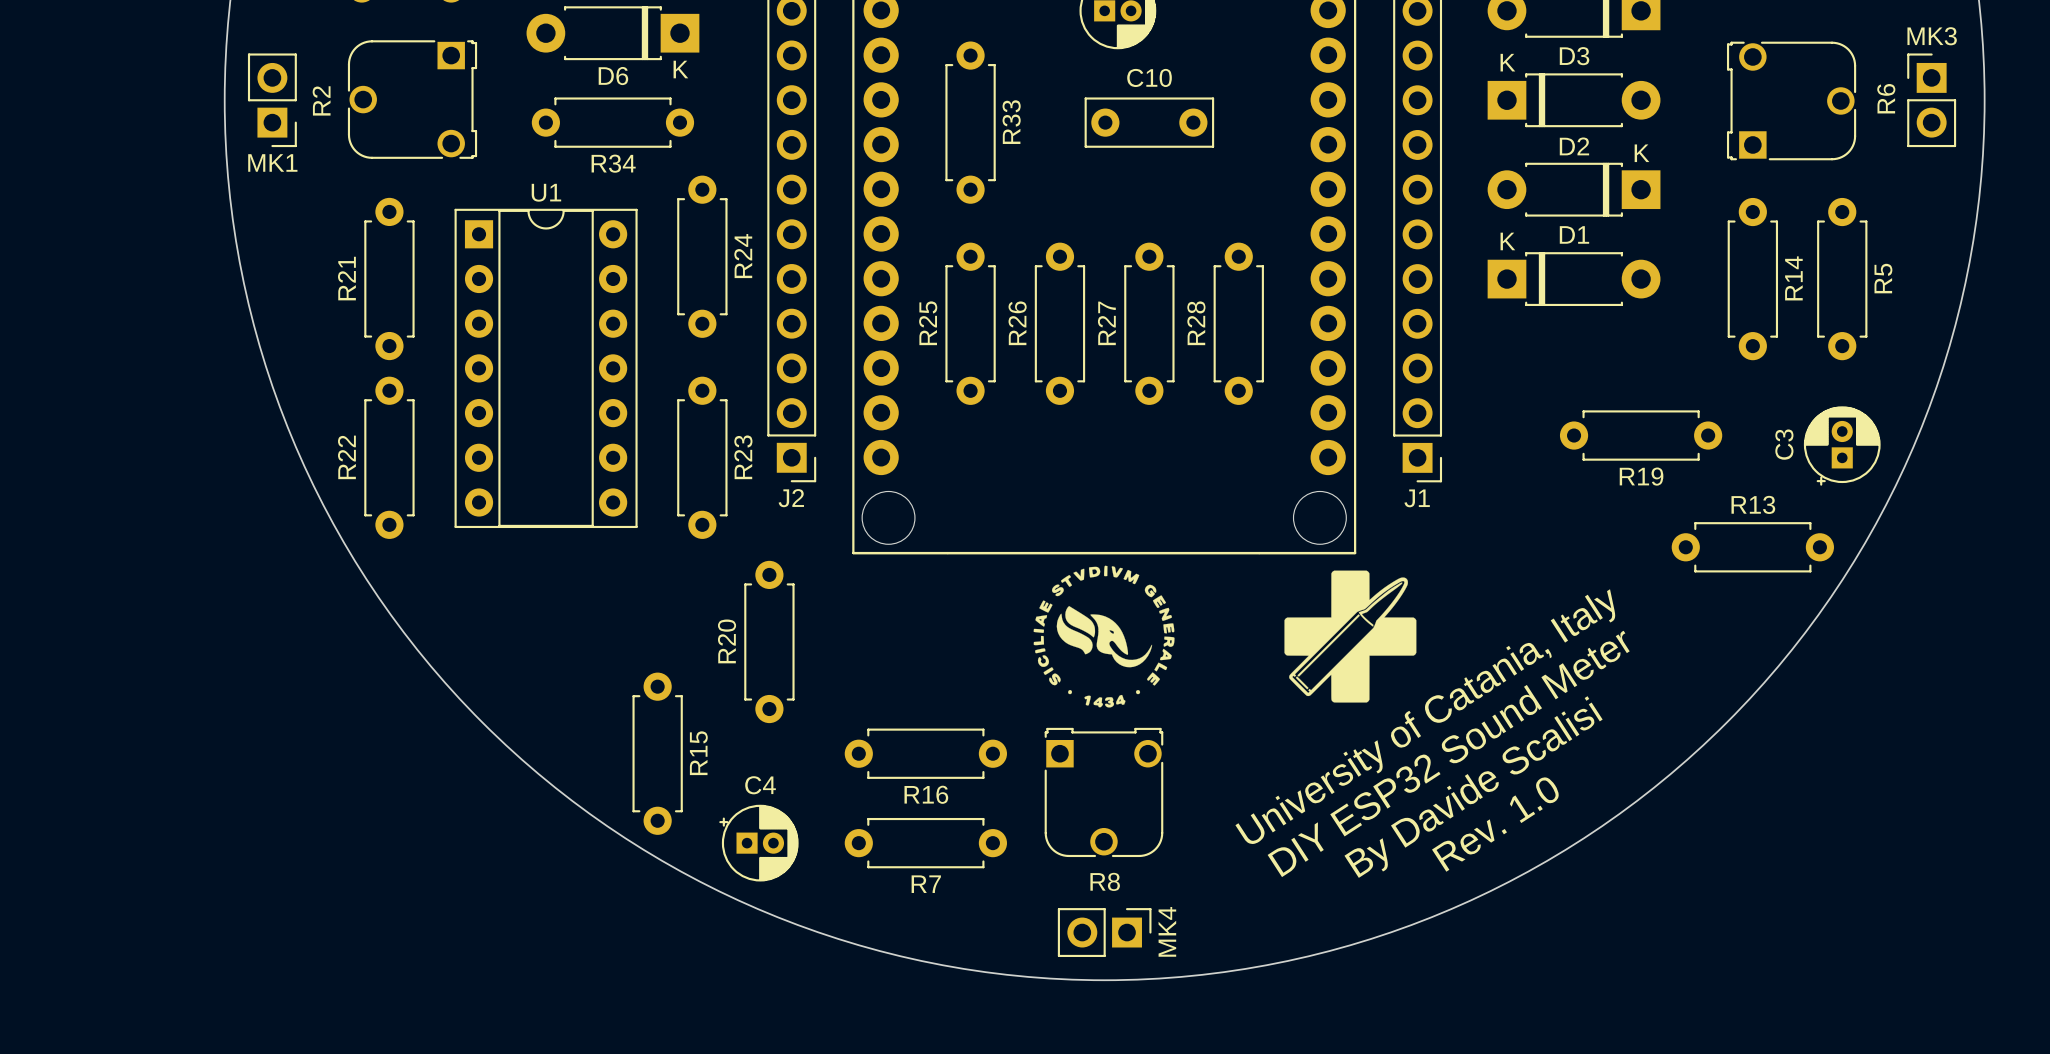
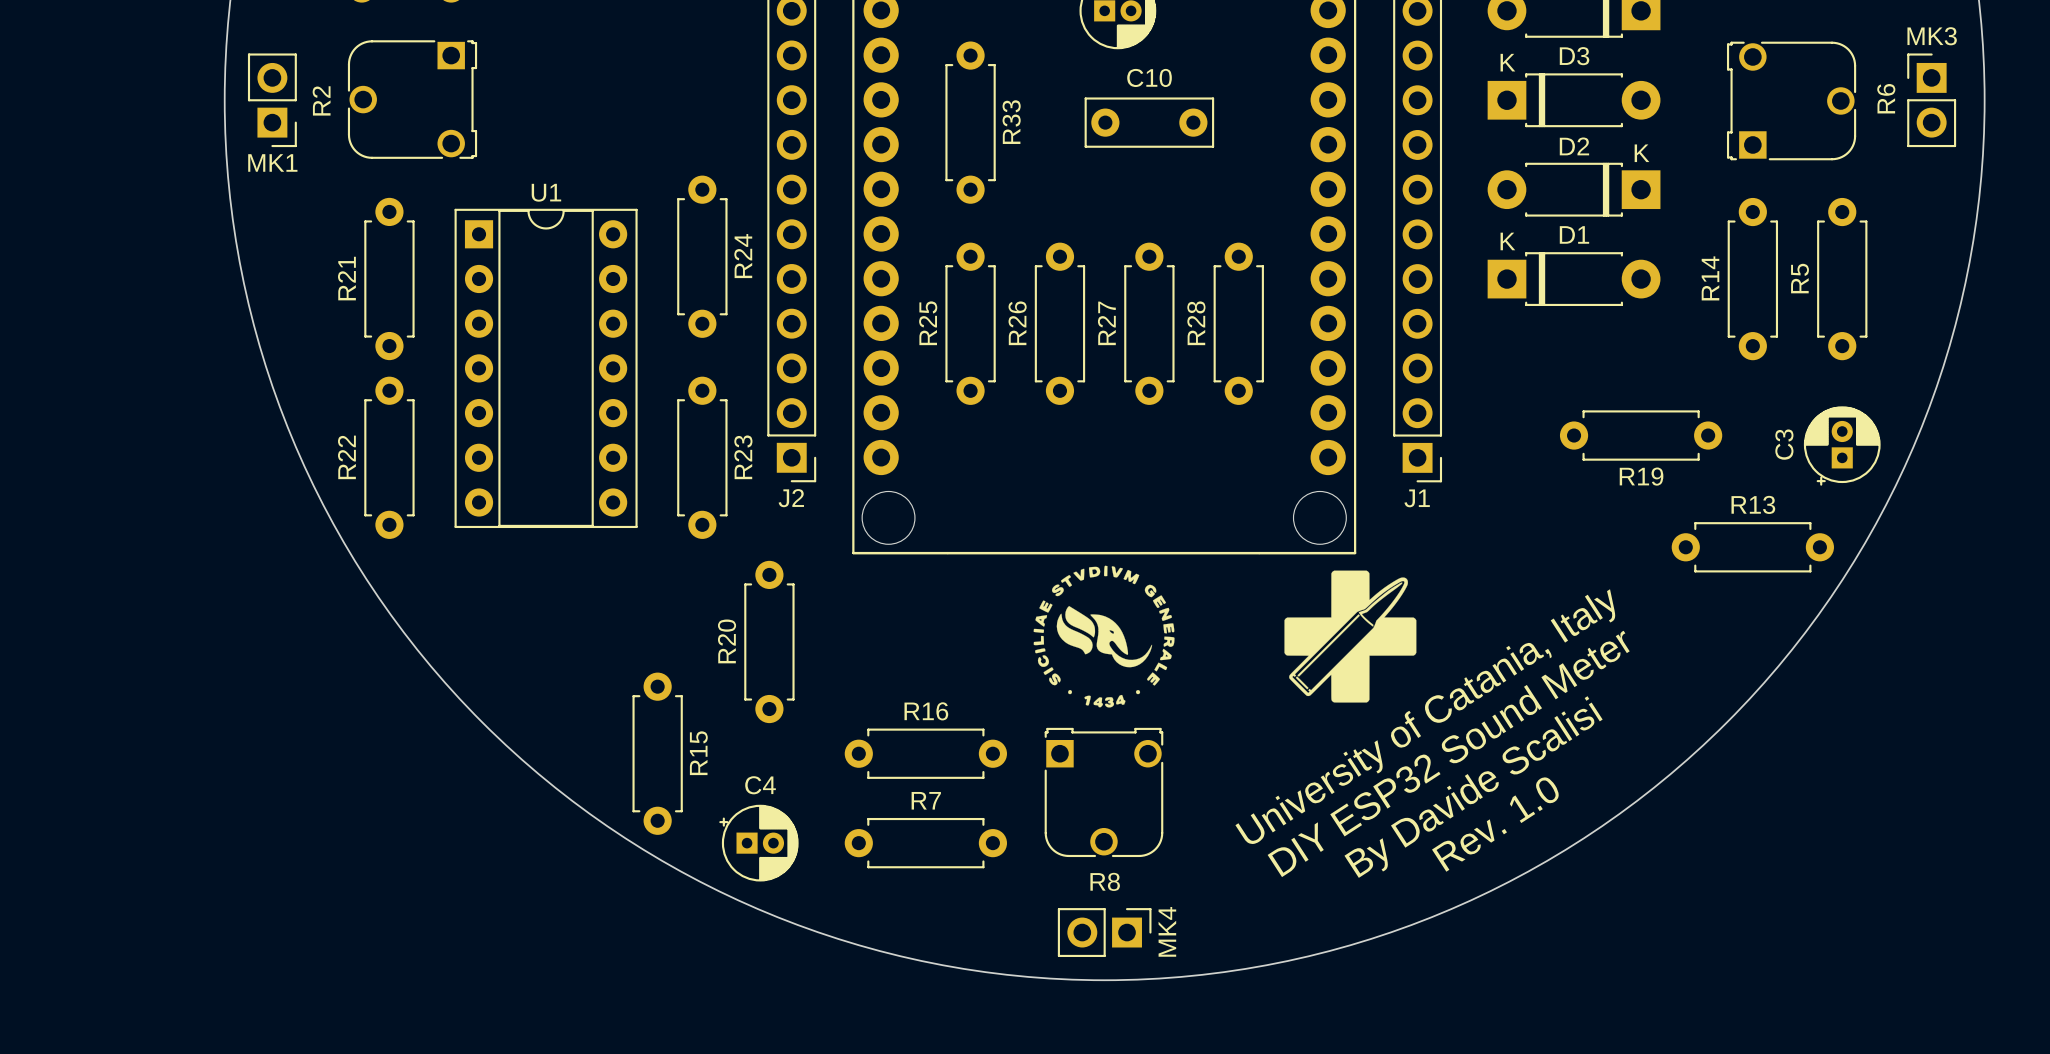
D6: (612, 33) -> none
R34: (612, 122) -> none
R14 name position: R14 (1793, 278) -> R14 (1710, 278)
R5 name position: R5 (1883, 278) -> R5 (1800, 278)
R16 name position: R16 (926, 794) -> R16 (926, 711)
R7 name position: R7 (926, 884) -> R7 (926, 800)

